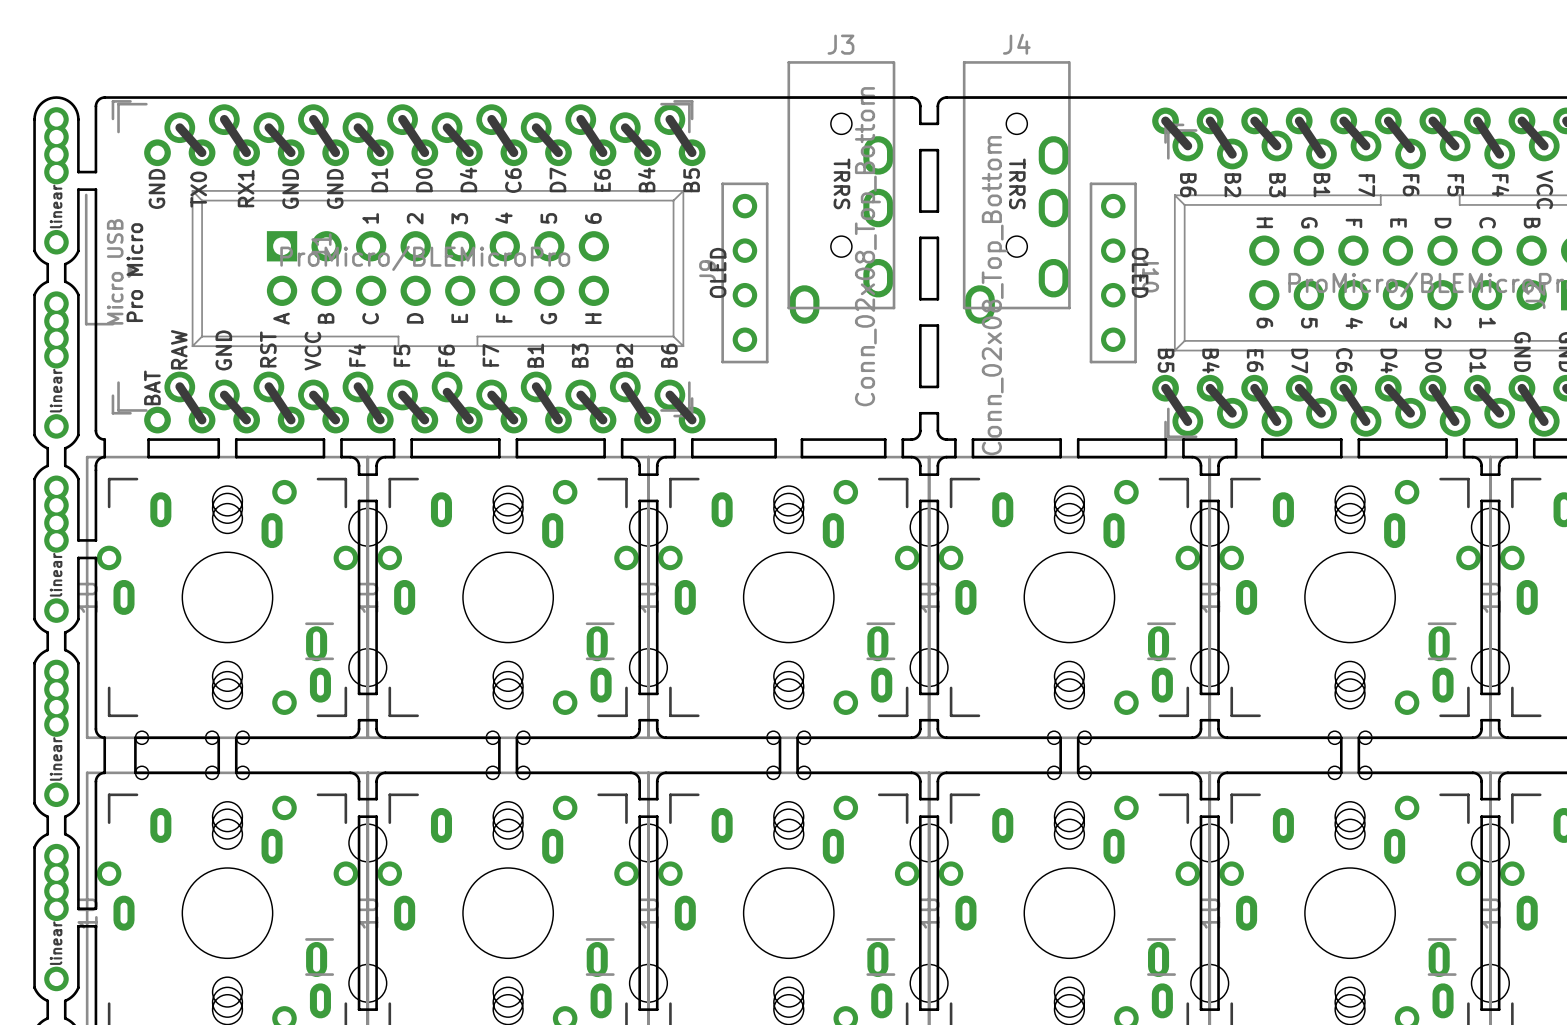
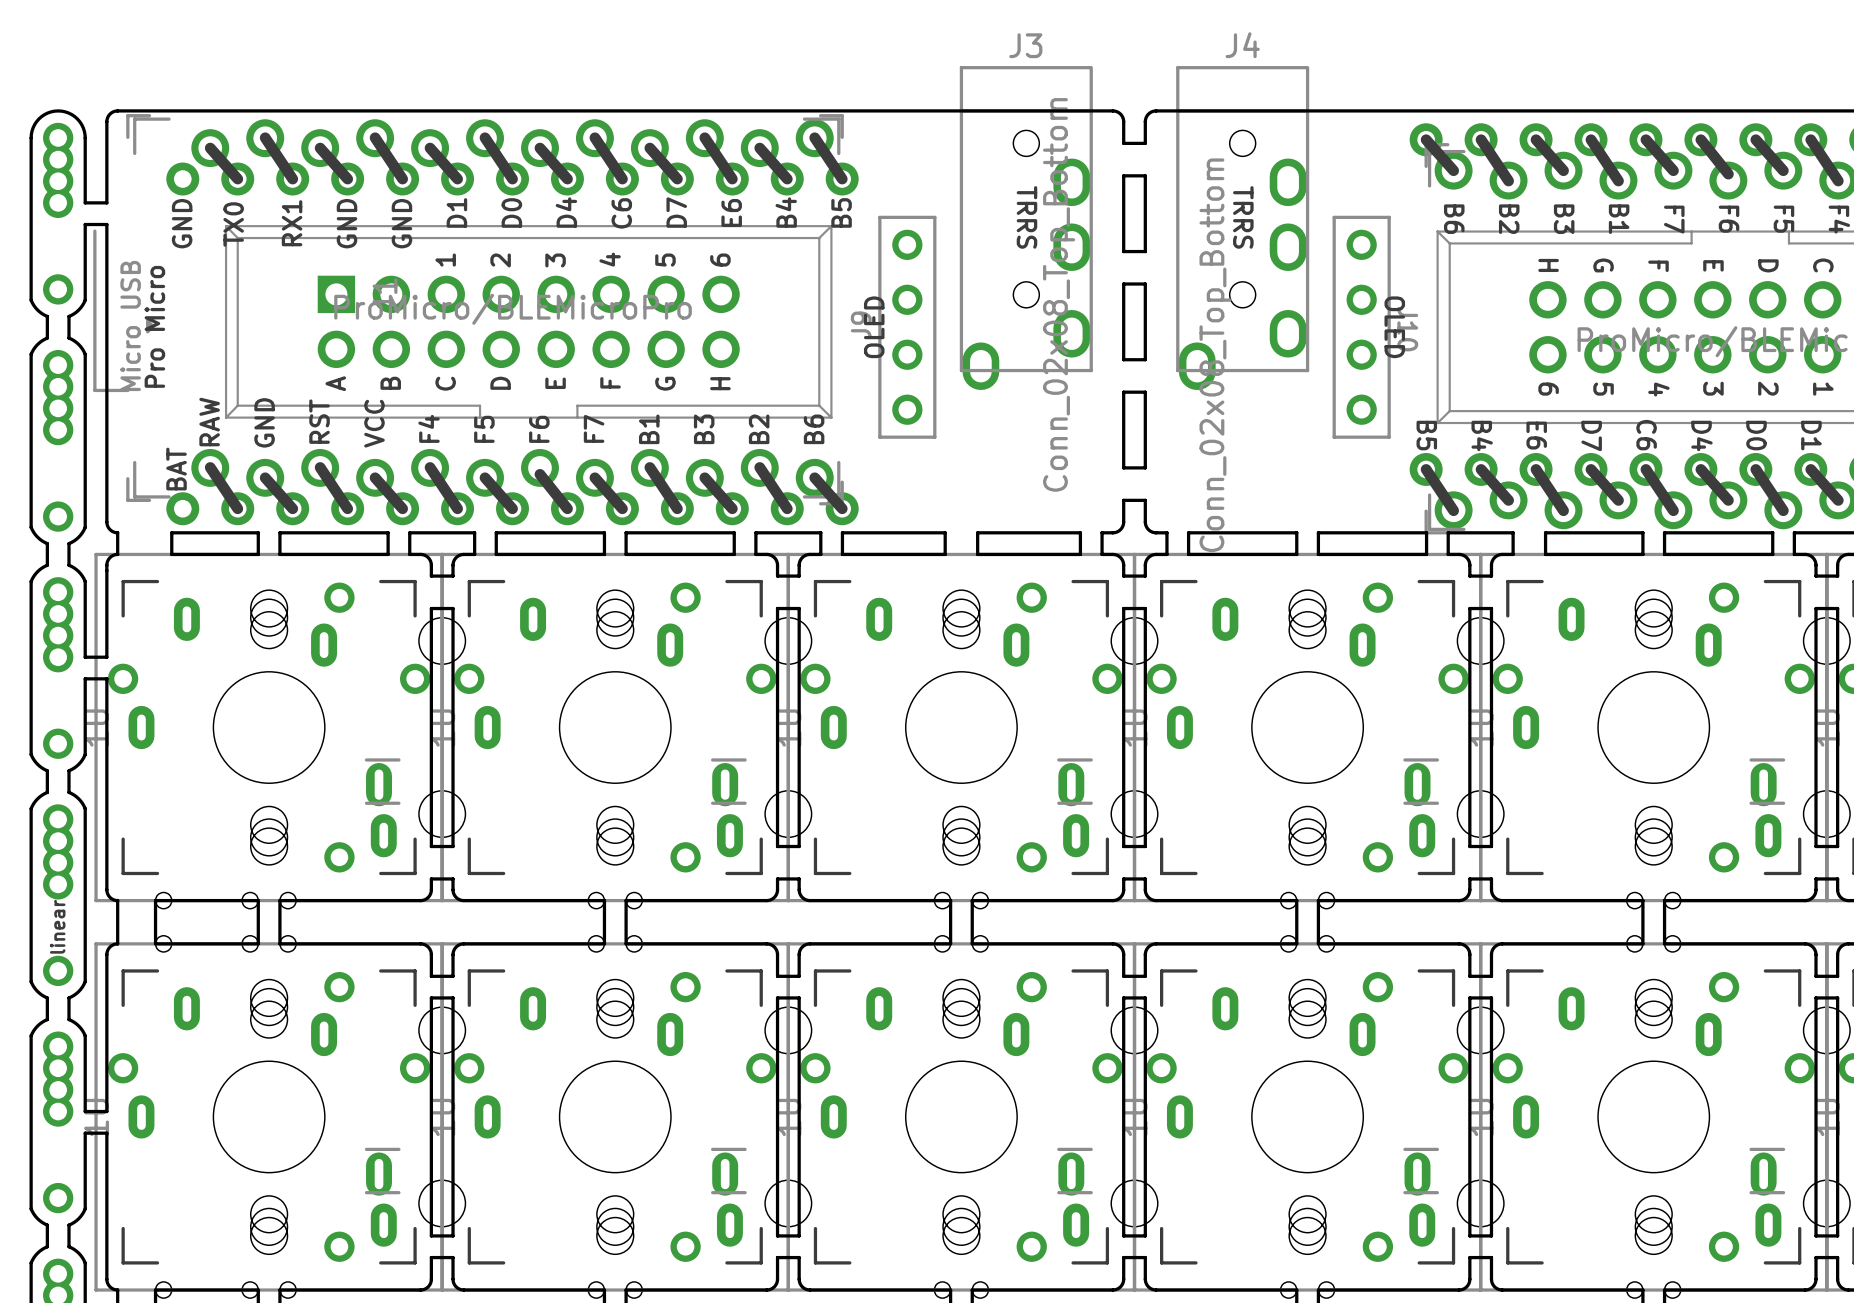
text: linear (56, 206) -> none
text: linear (56, 390) -> none
text: linear (56, 574) -> none
text: linear (56, 943) -> none

